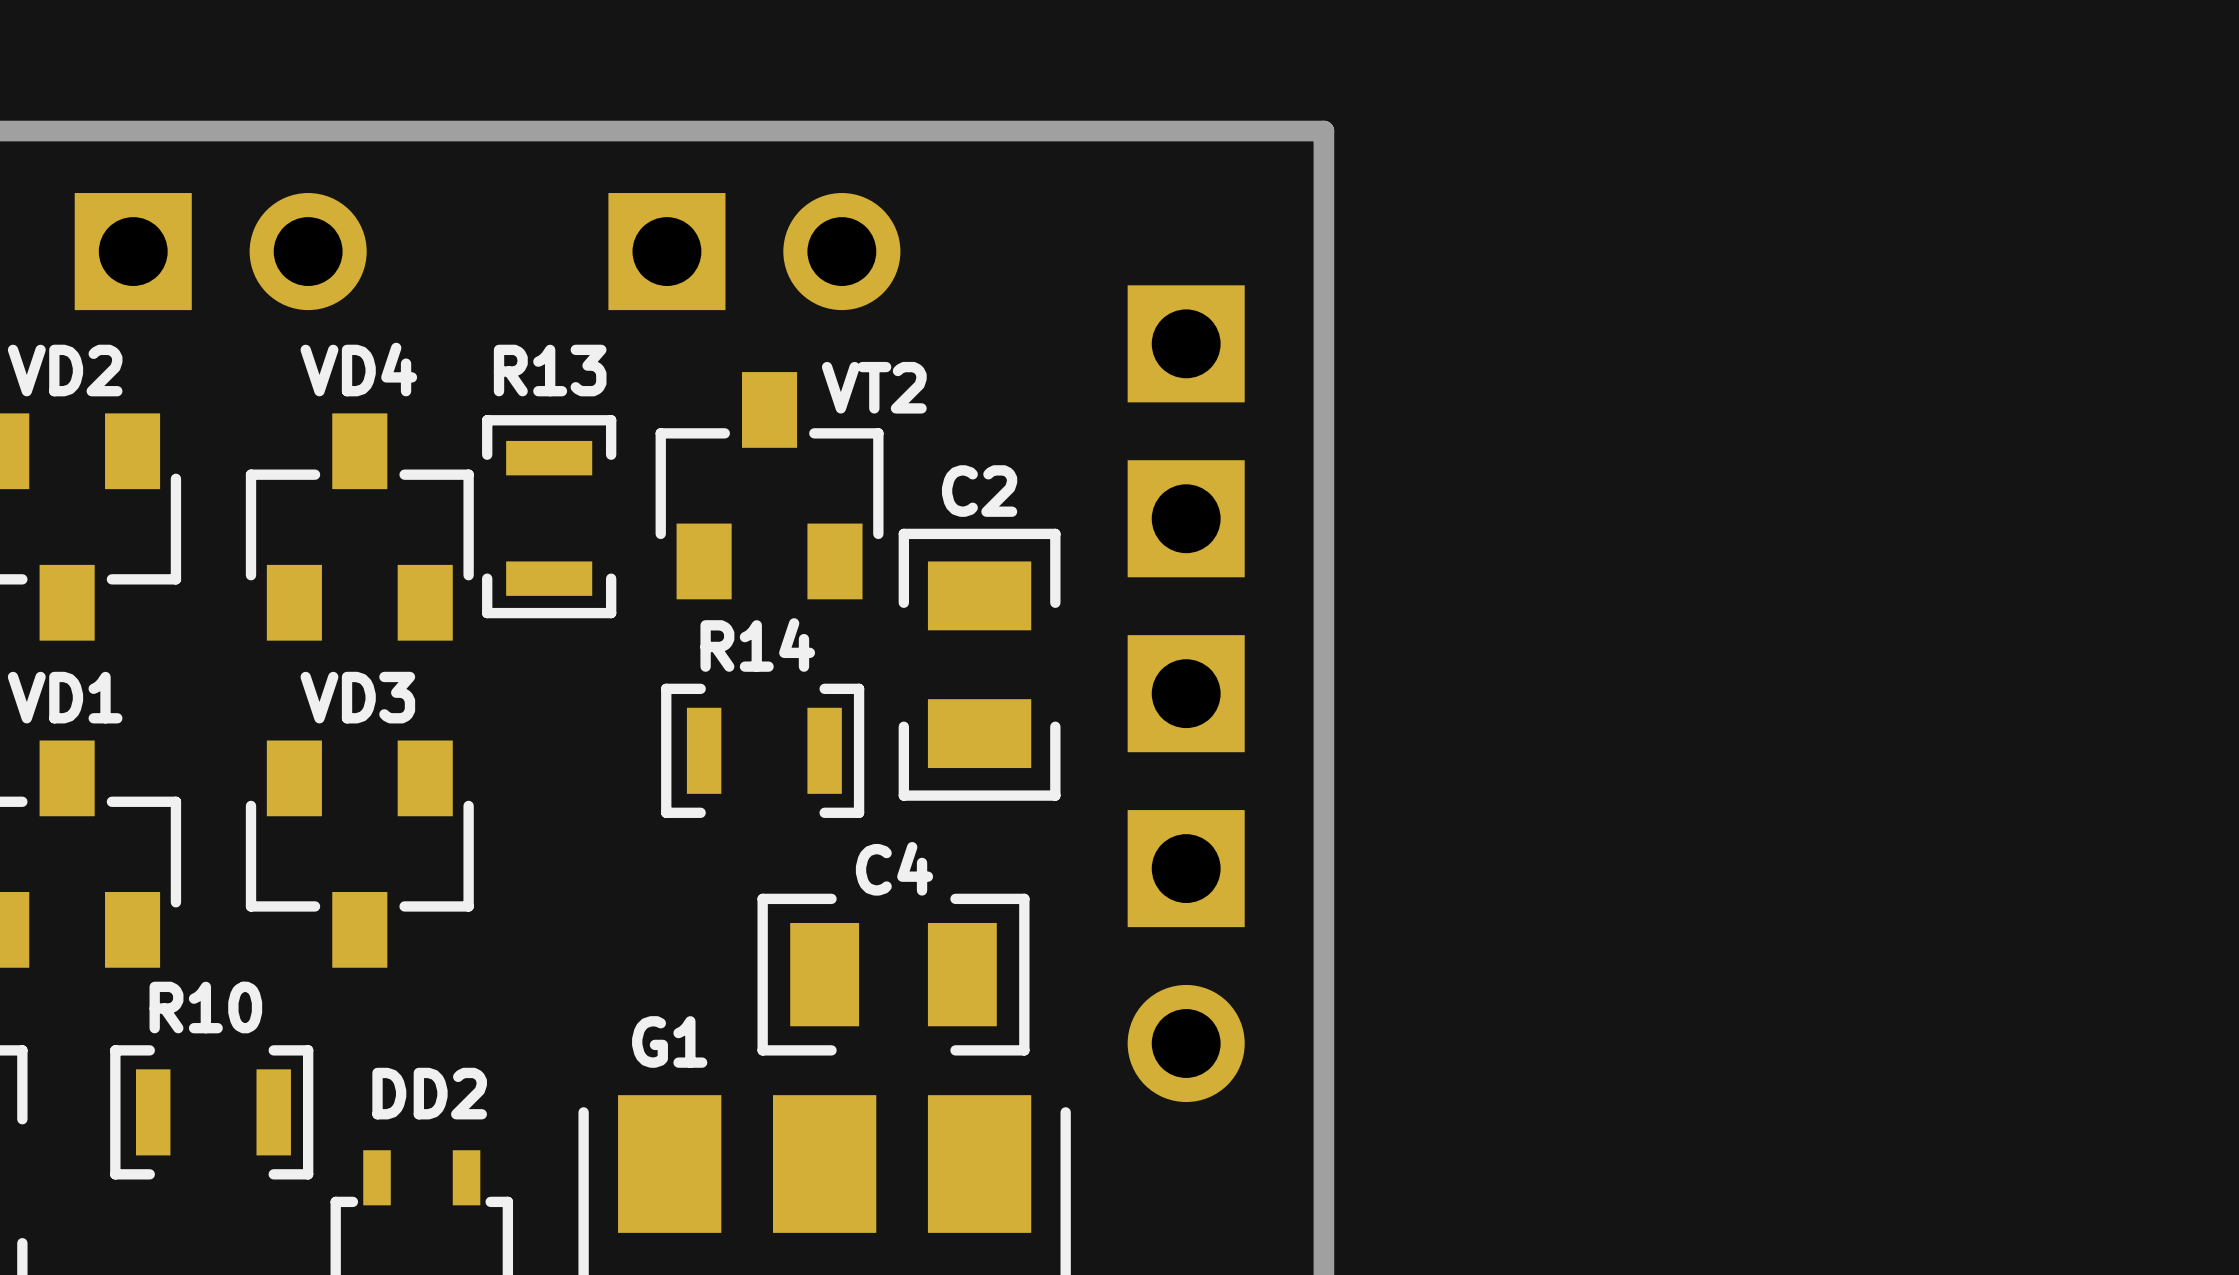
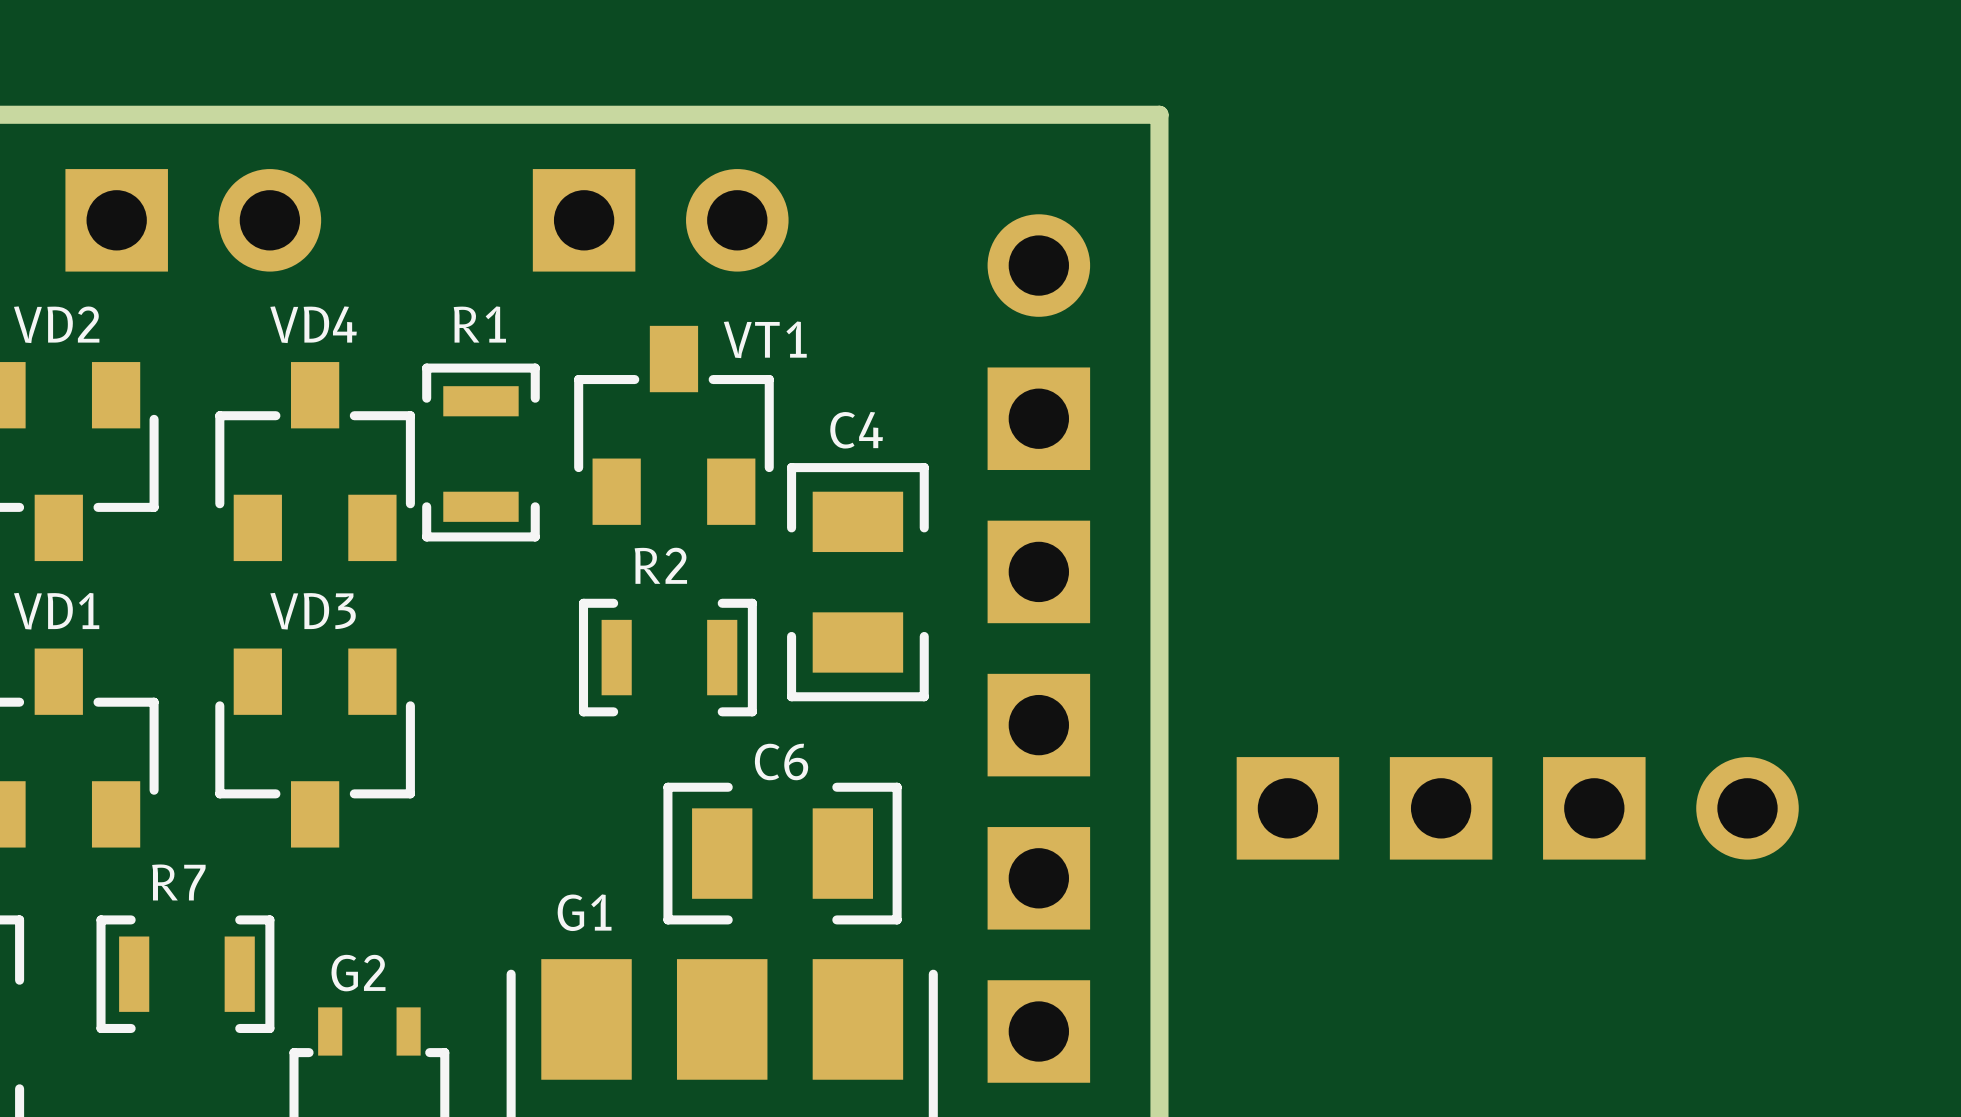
part footprint: [1127, 285, 1245, 1103] -> [987, 214, 1091, 1083]
R13 name: R13 (550, 370) -> R1 (479, 324)
VT2 name: VT2 (874, 387) -> VT1 (765, 339)
C2 name: C2 (979, 491) -> C4 (856, 430)
R14 name: R14 (757, 645) -> R2 (660, 565)
C4 name: C4 (894, 868) -> C6 (781, 761)
part: none -> (1517, 808)
R10 name: R10 (205, 1007) -> R7 (178, 882)
DD2 name: DD2 (429, 1093) -> G2 (358, 973)

